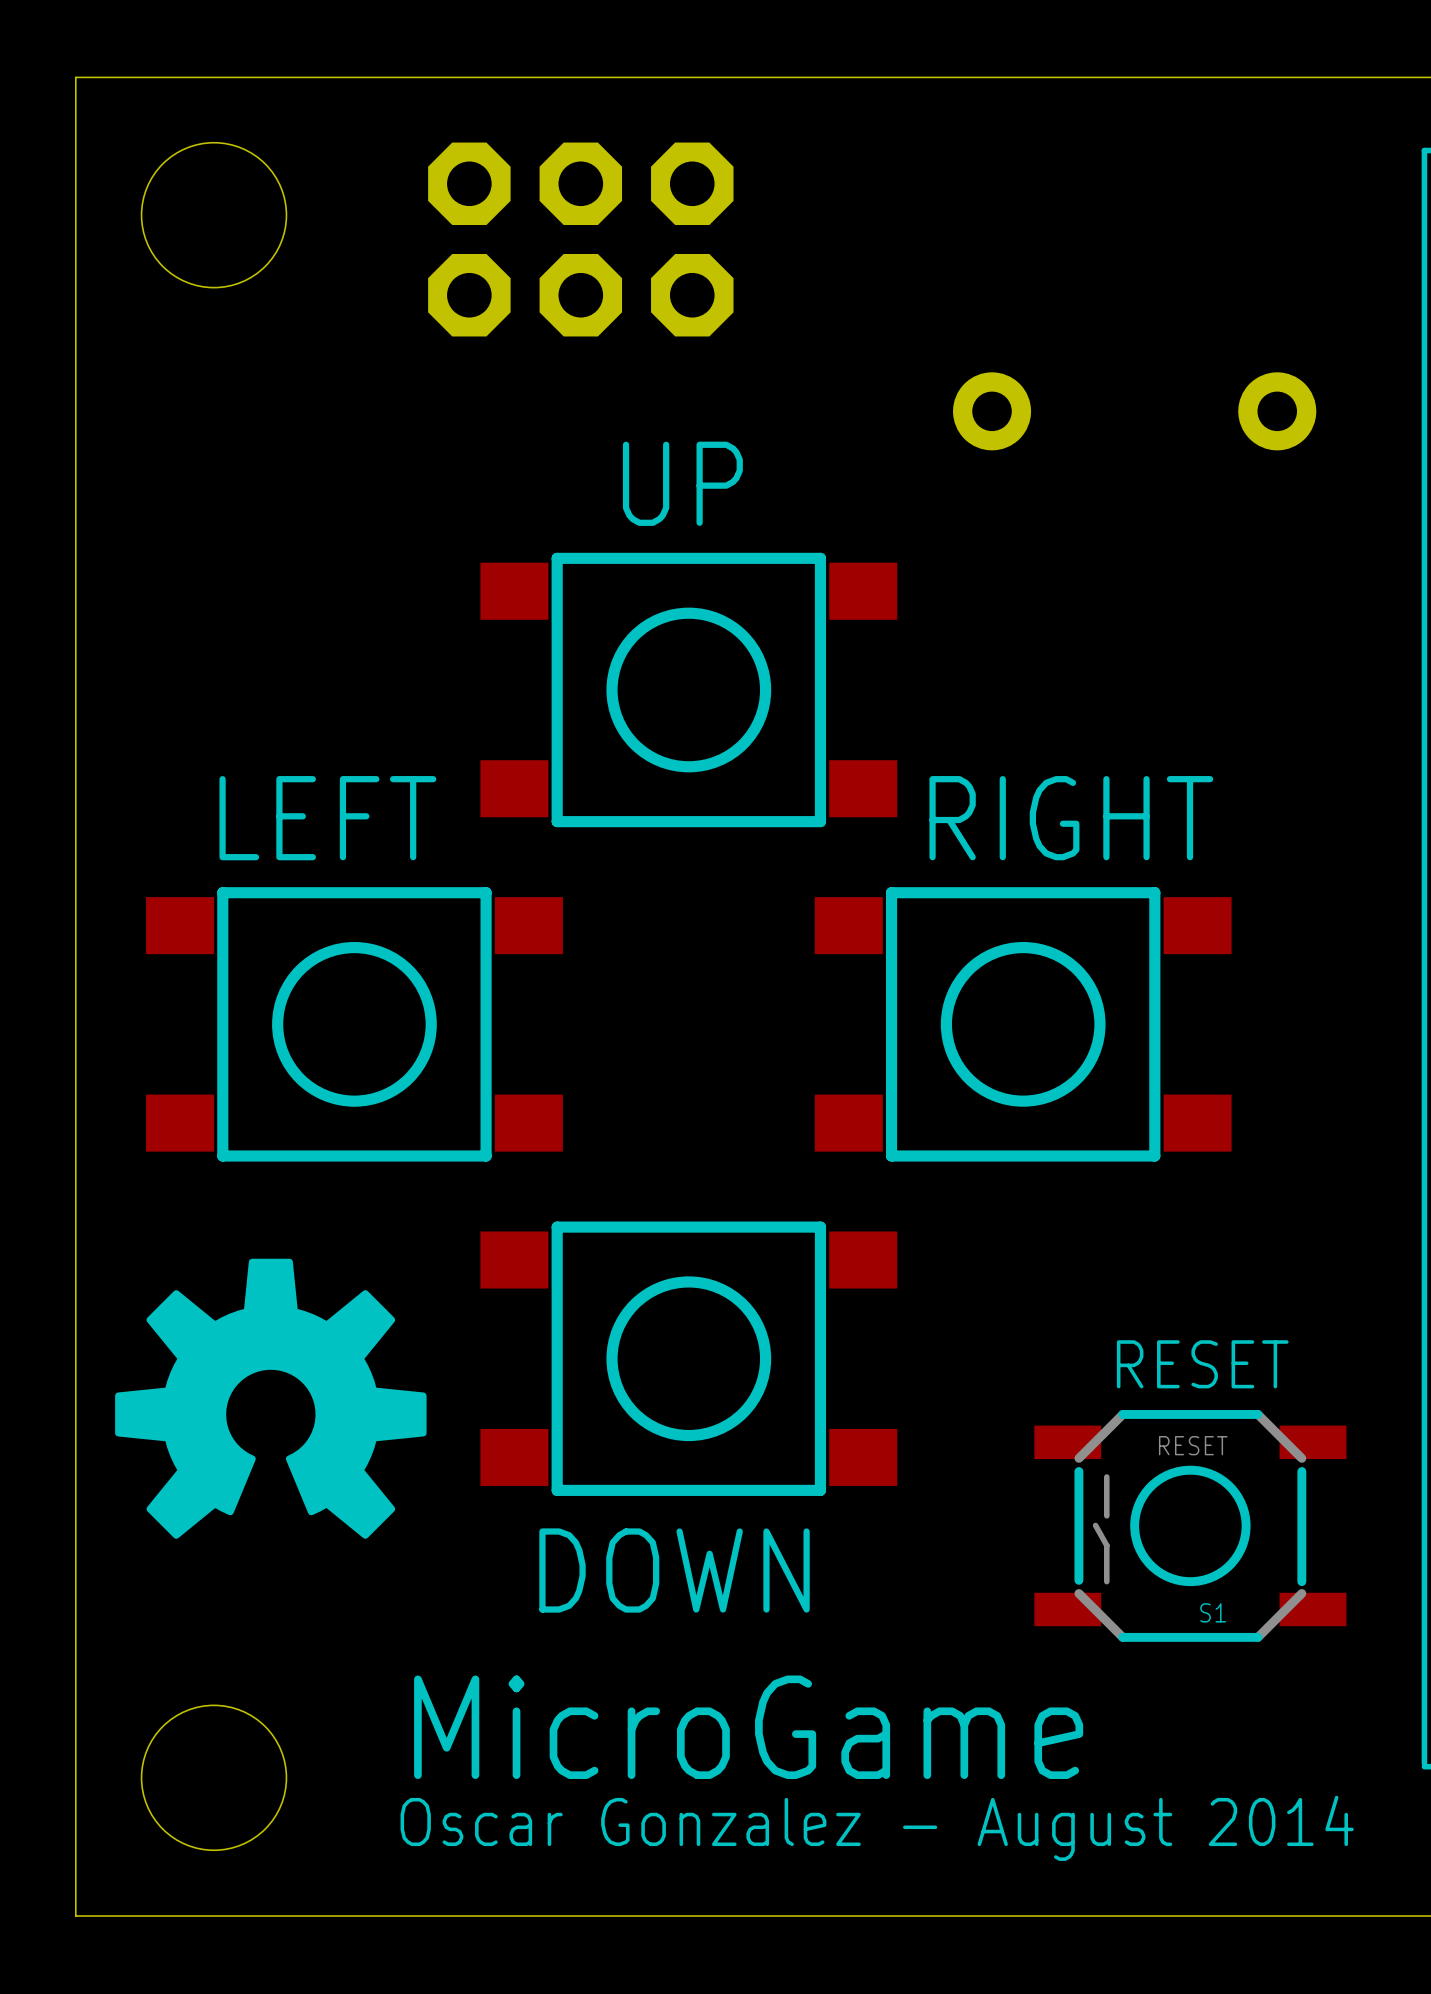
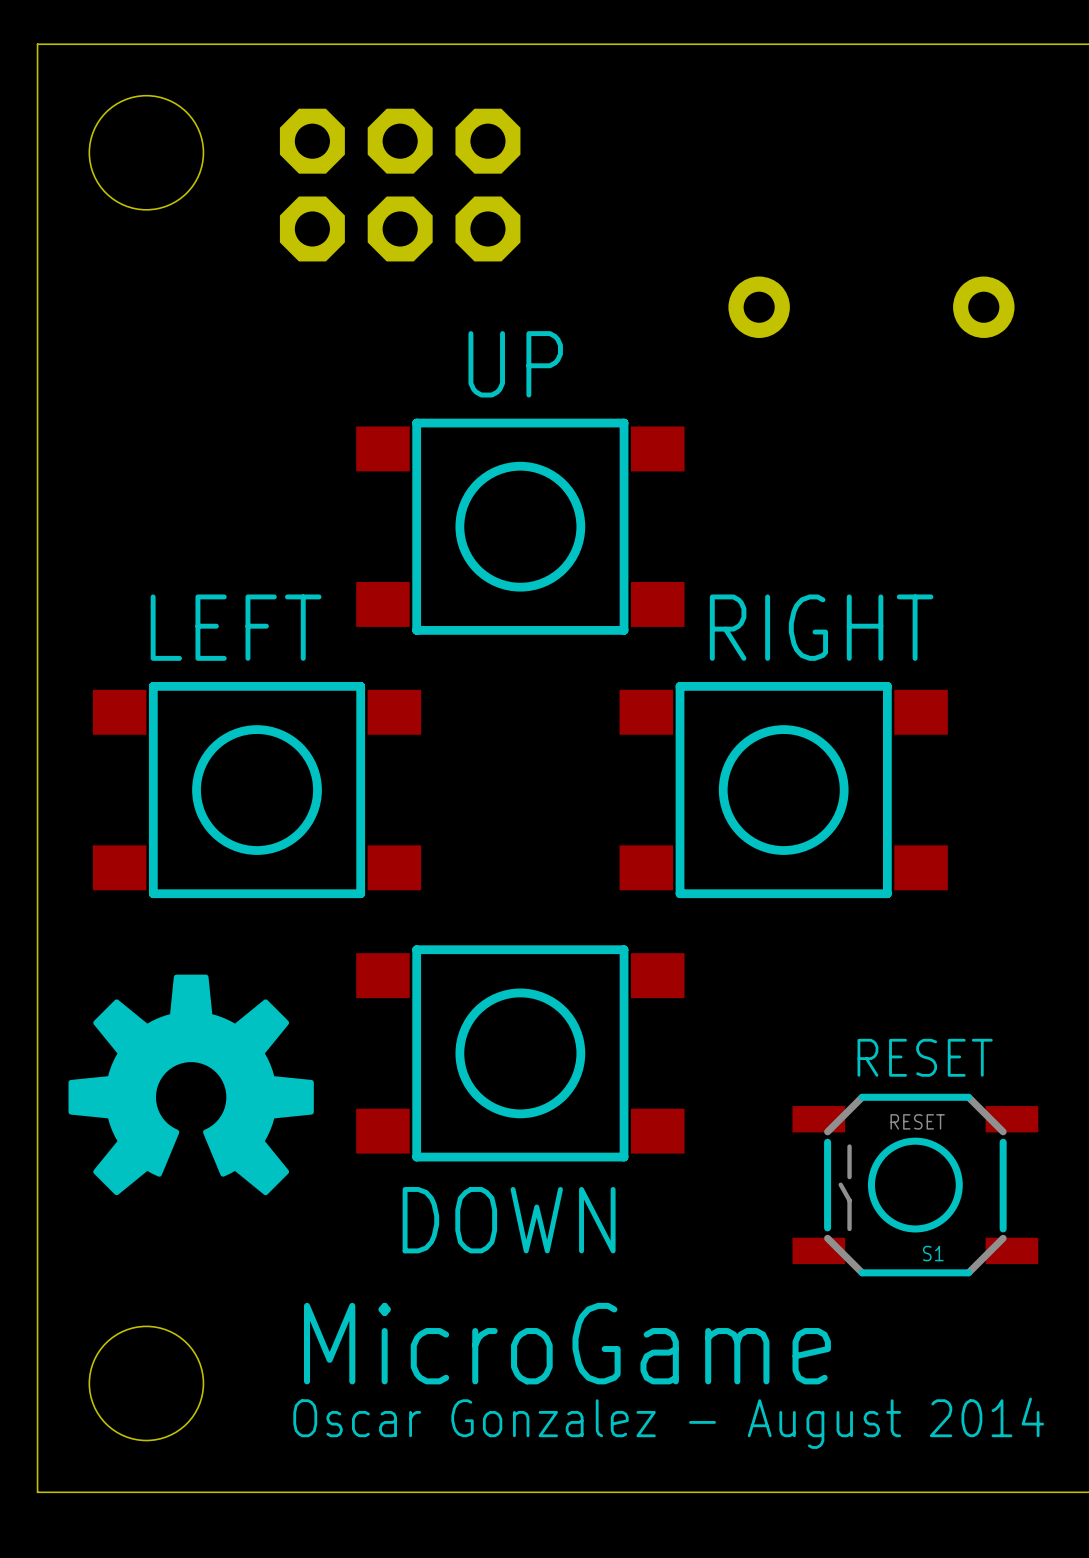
part position: (580, 239) -> (400, 185)

